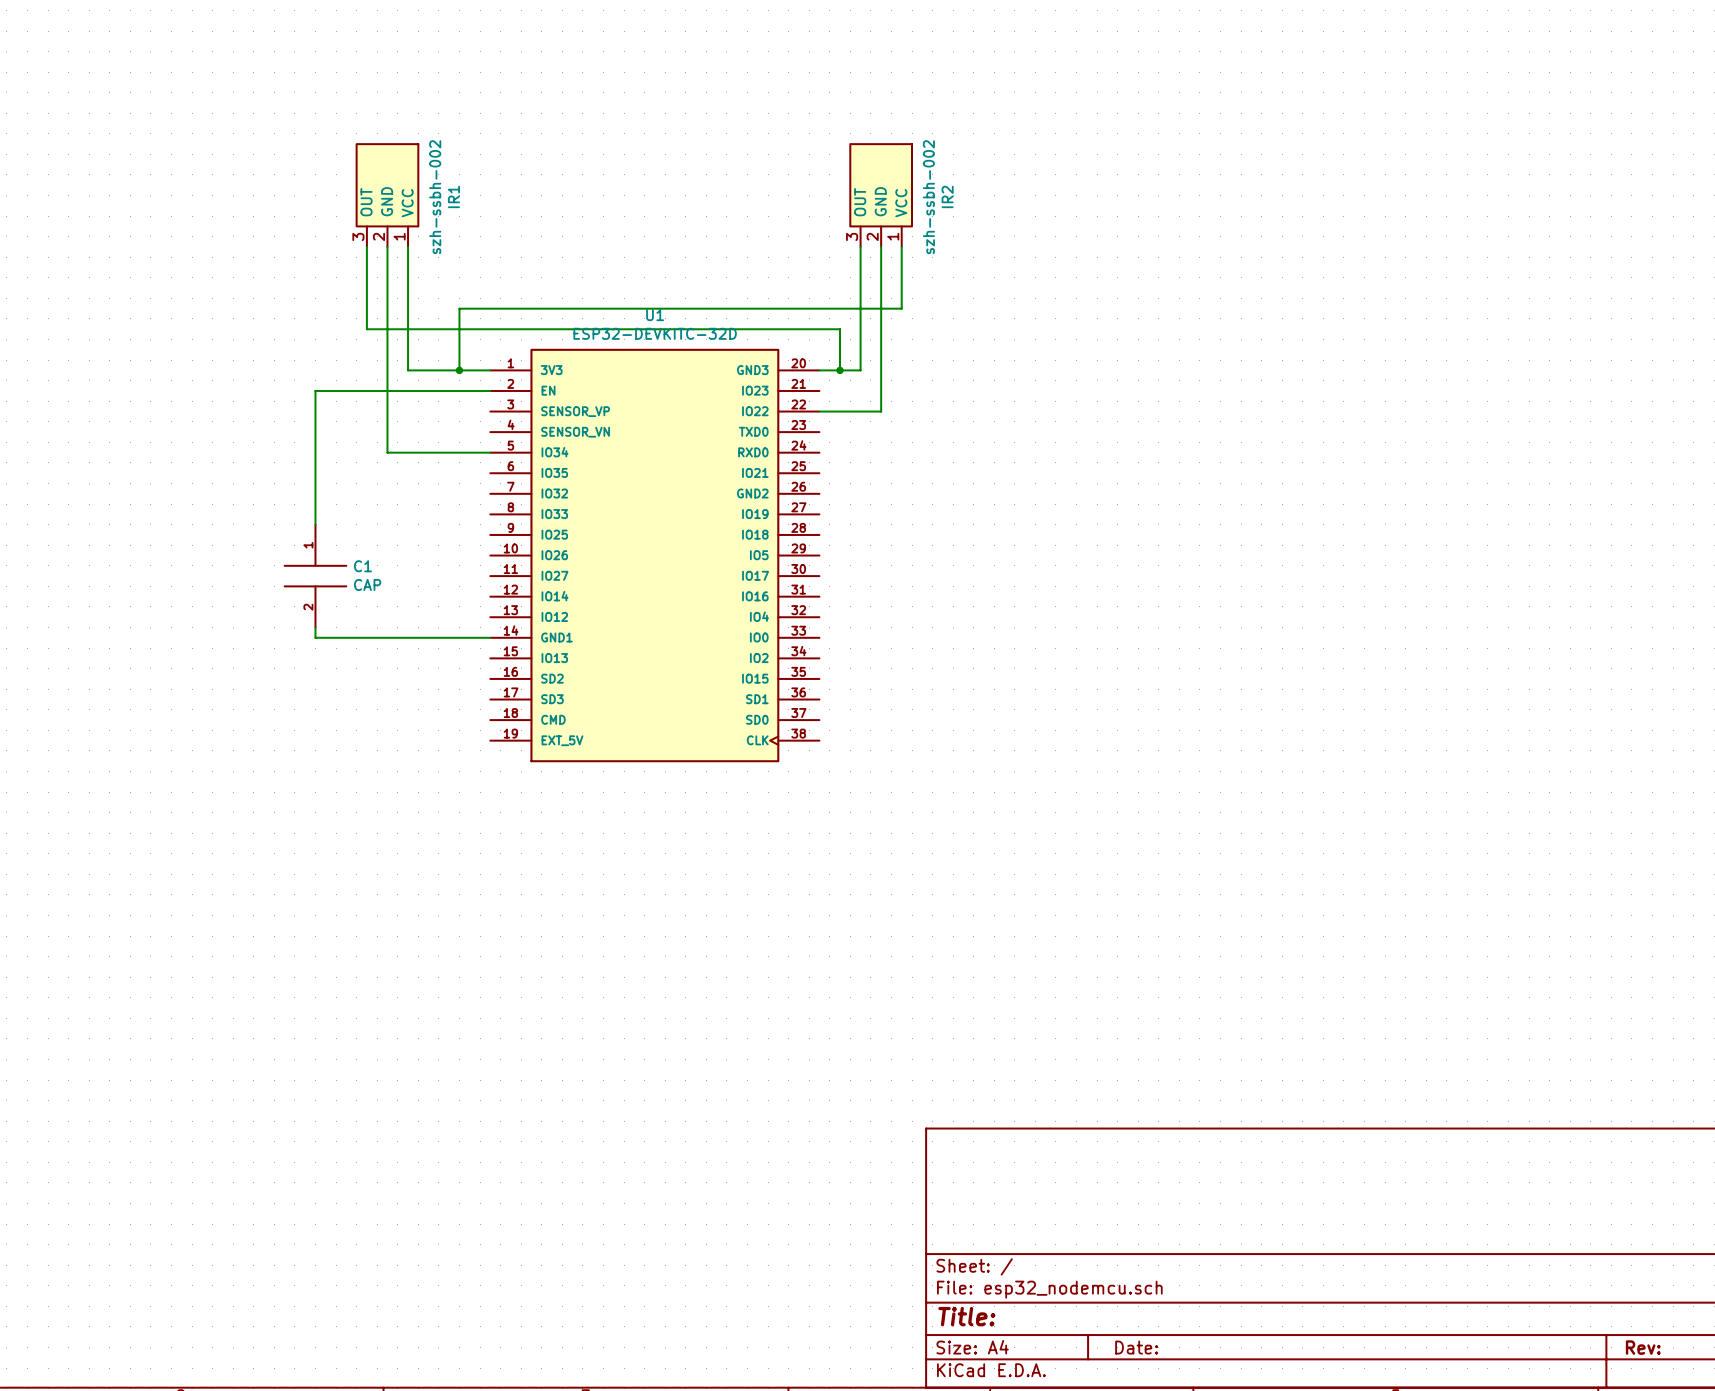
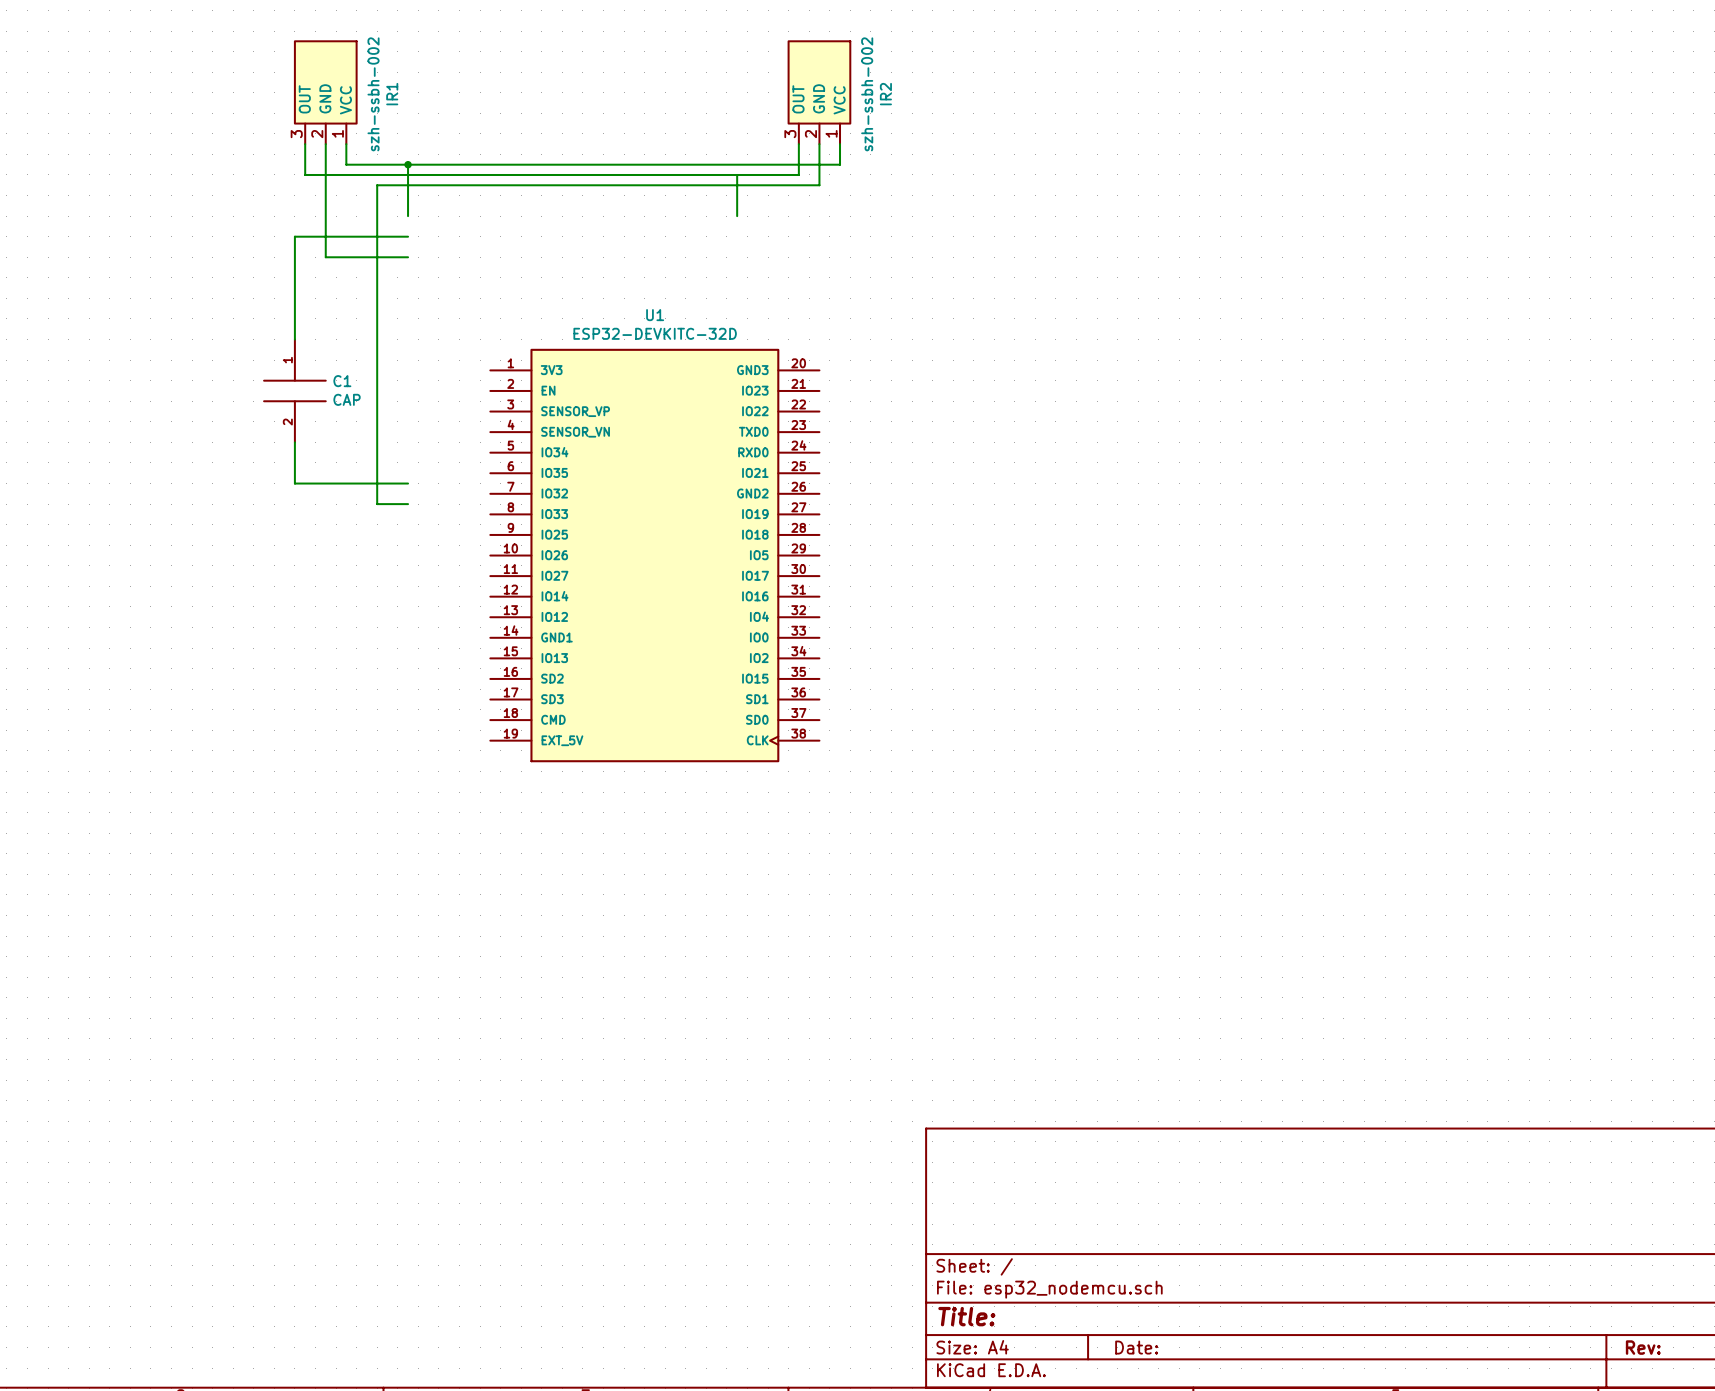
wire: none -> (305, 144) (305, 174) (798, 174) (798, 144)
wire: none -> (325, 144) (325, 257) (408, 257)
wire: none -> (346, 144) (346, 164) (840, 164) (840, 144)
wire: none -> (819, 144) (819, 185) (377, 185) (377, 504) (408, 504)
junction: none -> (408, 164)
wire: none -> (737, 174) (737, 216)
IR1 position: (387, 195) -> (325, 92)
IR2 position: (881, 195) -> (819, 92)
wire: none -> (408, 236) (294, 236) (294, 339)
wire: (366, 246) (366, 329) (840, 329) (840, 370) -> none
wire: (387, 246) (387, 452) (490, 452) -> none
wire: (408, 246) (408, 370) (490, 370) -> none
wire: (860, 246) (860, 370) (819, 370) -> none
wire: (881, 246) (881, 411) (819, 411) -> none
wire: (901, 246) (901, 308) (459, 308) (459, 370) -> none
junction: (459, 370) -> none
junction: (840, 370) -> none
wire: (490, 390) (315, 390) (315, 524) -> none
wire: none -> (294, 442) (294, 483) (408, 483)
C1 position: (315, 576) -> (294, 390)
wire: (315, 627) (315, 637) (490, 637) -> none

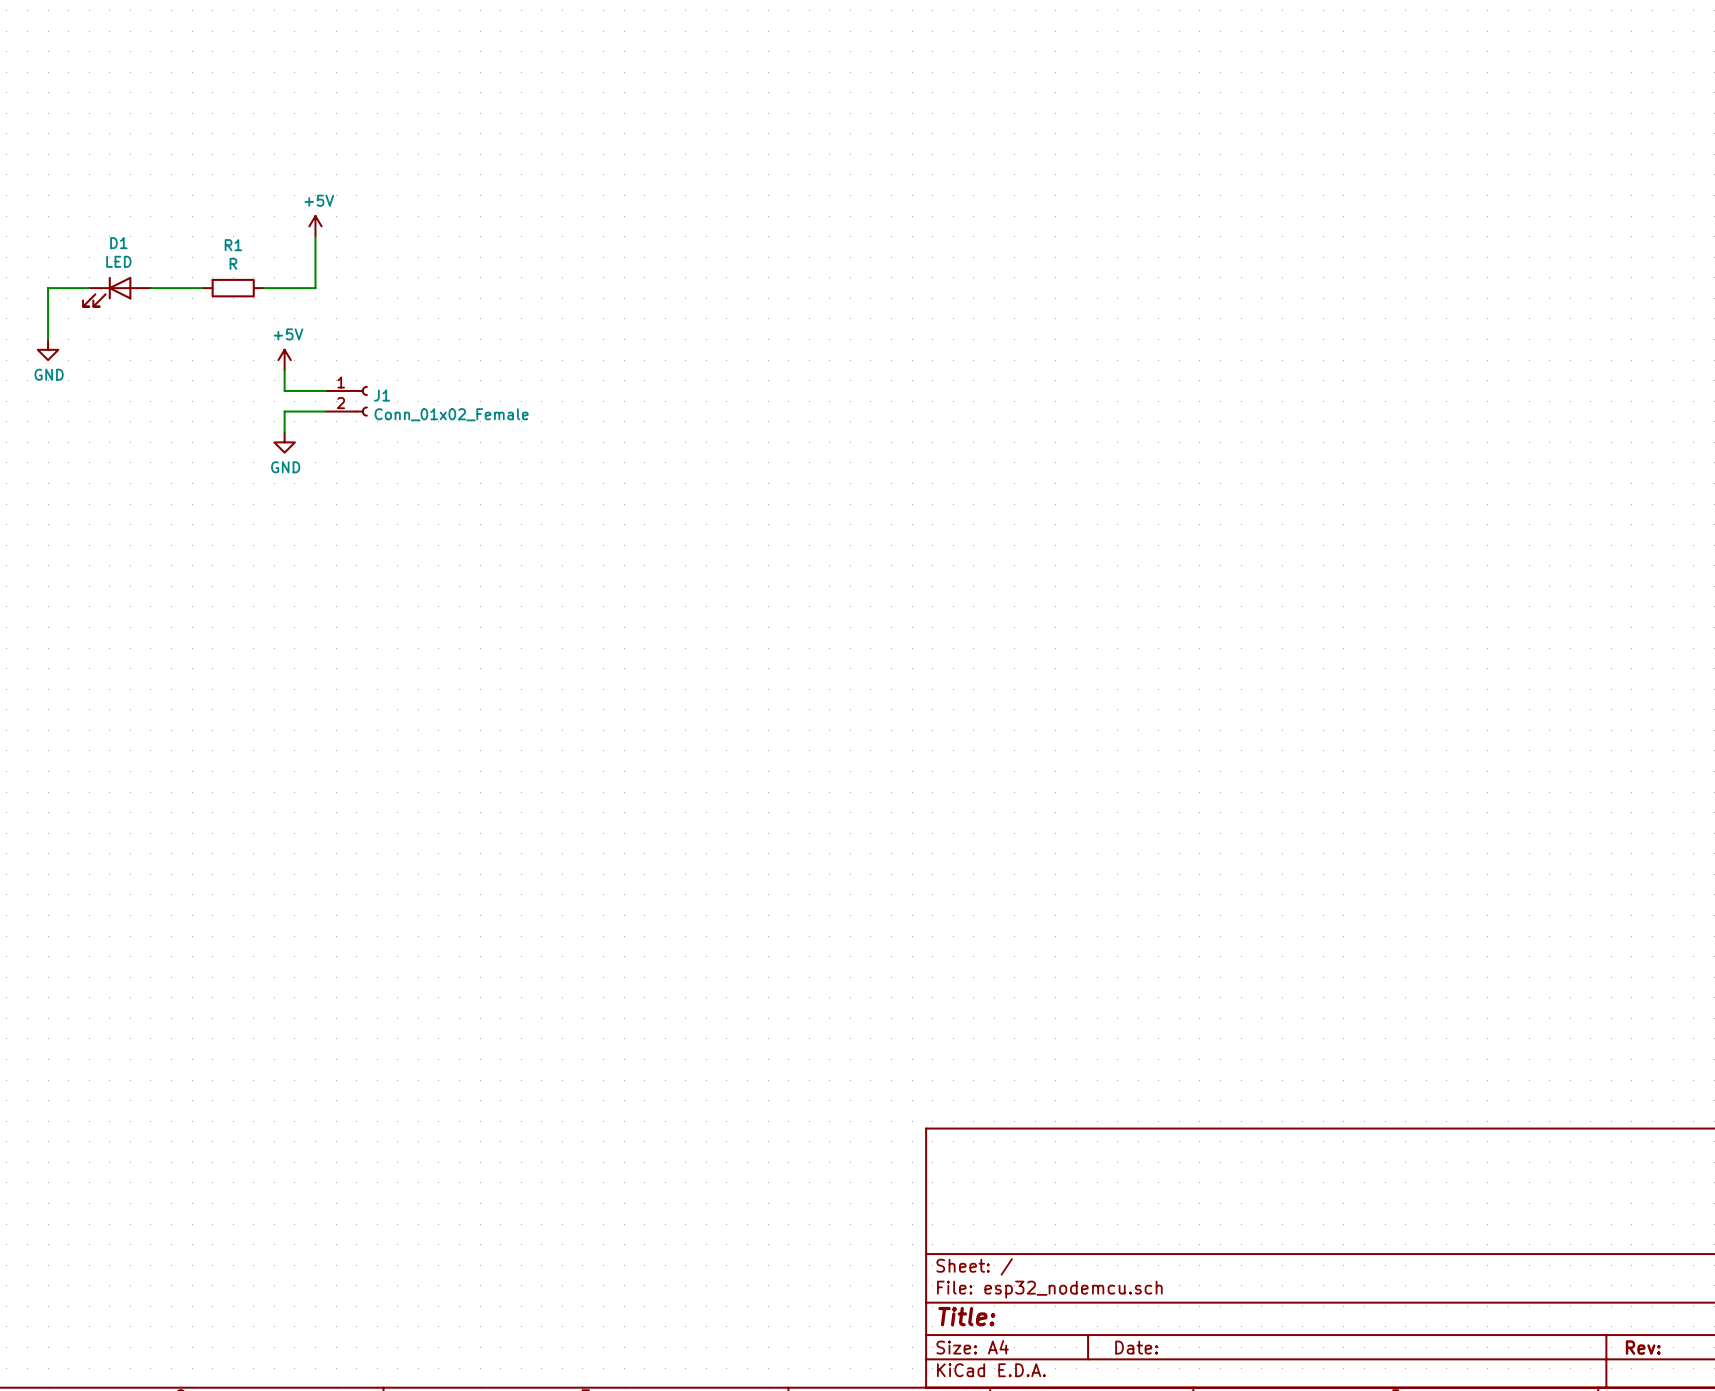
IR1: szh-ssbh-002 (325, 92) -> none
IR2: szh-ssbh-002 (819, 92) -> none
wire: (305, 144) (305, 174) (798, 174) (798, 144) -> none
wire: (325, 144) (325, 257) (408, 257) -> none
wire: (346, 144) (346, 164) (840, 164) (840, 144) -> none
wire: (819, 144) (819, 185) (377, 185) (377, 504) (408, 504) -> none
wire: (408, 164) (408, 216) -> none
junction: (408, 164) -> none
wire: (737, 174) (737, 216) -> none
power symbol: none -> +5V (315, 226)
wire: none -> (315, 236) (315, 288) (264, 288)
wire: (408, 236) (294, 236) (294, 339) -> none
wire: none -> (89, 288) (48, 288) (48, 339)
wire: none -> (150, 288) (202, 288)
R1: none -> R (233, 288)
D1: none -> LED (116, 291)
power symbol: none -> GND (48, 349)
power symbol: none -> +5V (284, 360)
wire: none -> (284, 370) (284, 390) (325, 390)
C1: CAP (294, 390) -> none
J1: none -> Conn_01x02_Female (346, 401)
wire: none -> (325, 411) (284, 411) (284, 432)
power symbol: none -> GND (284, 442)
wire: (294, 442) (294, 483) (408, 483) -> none
U1: ESP32-DEVKITC-32D (654, 555) -> none

